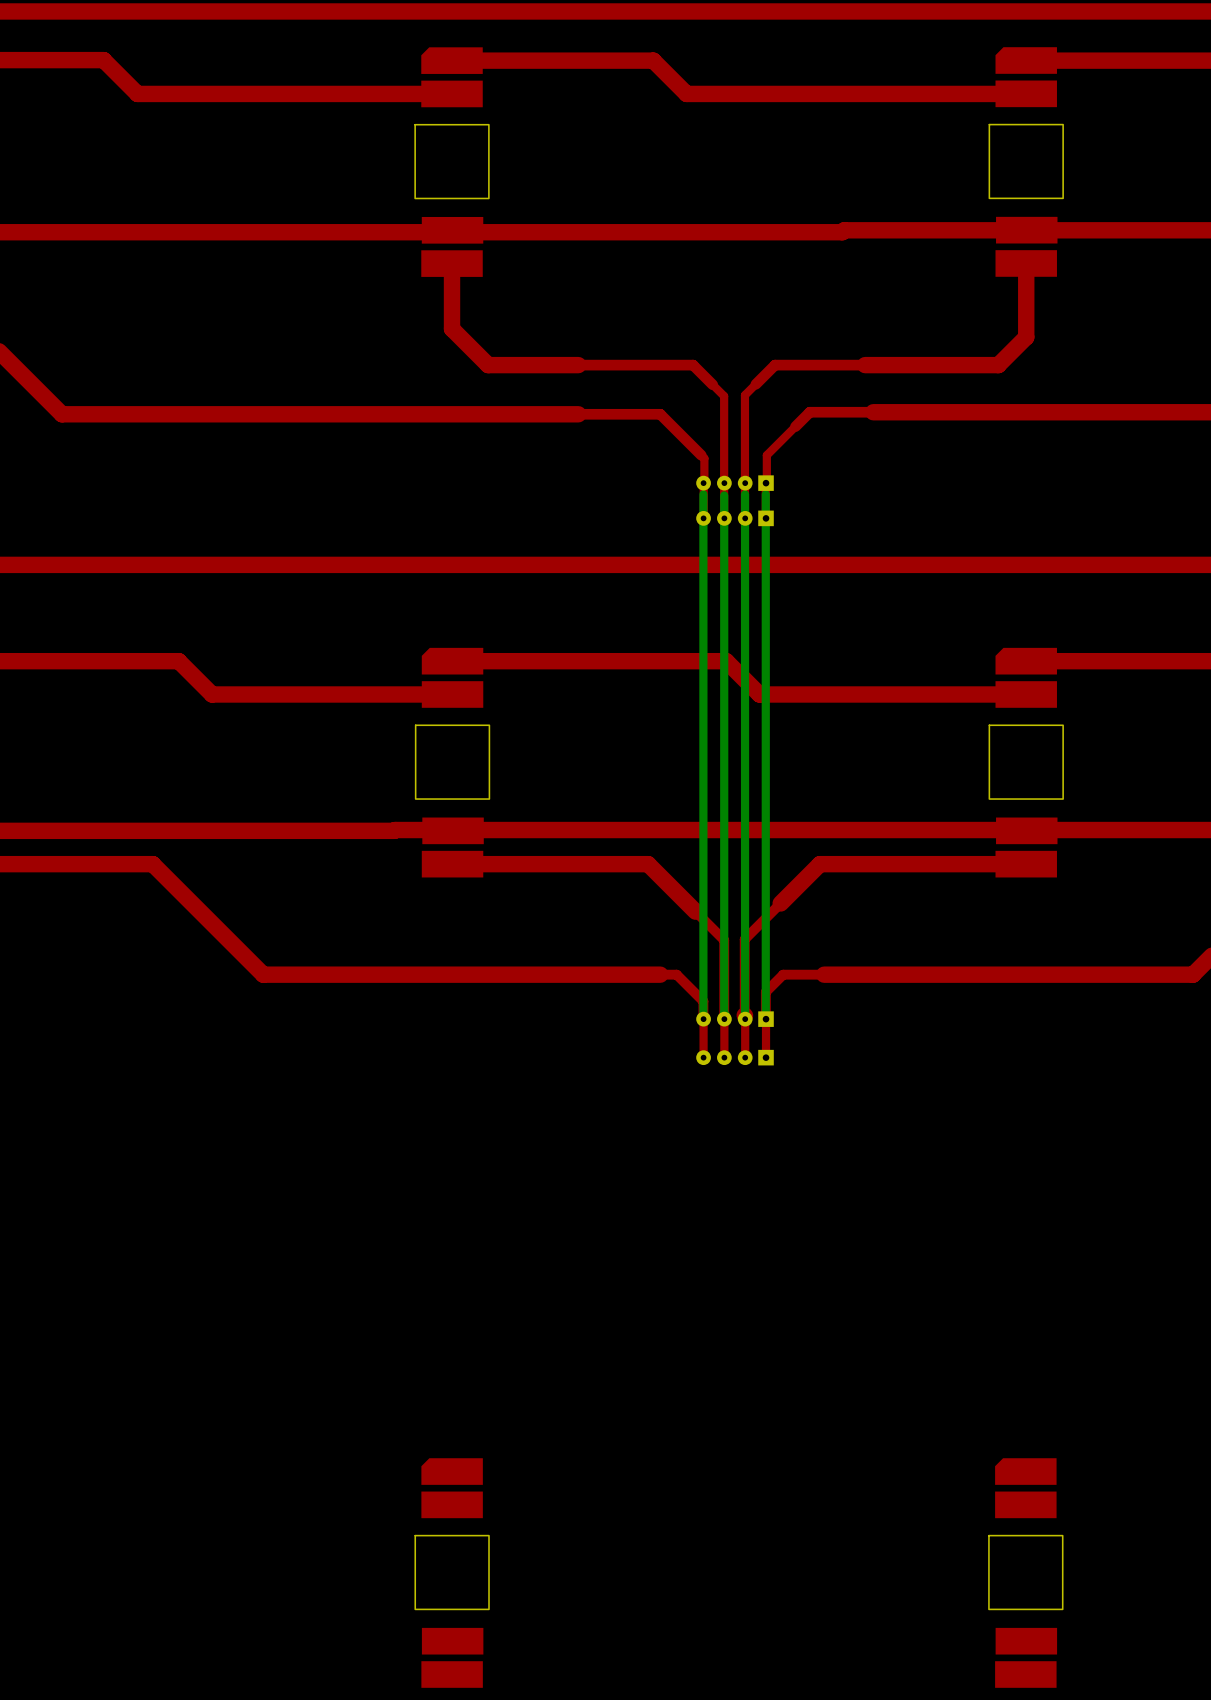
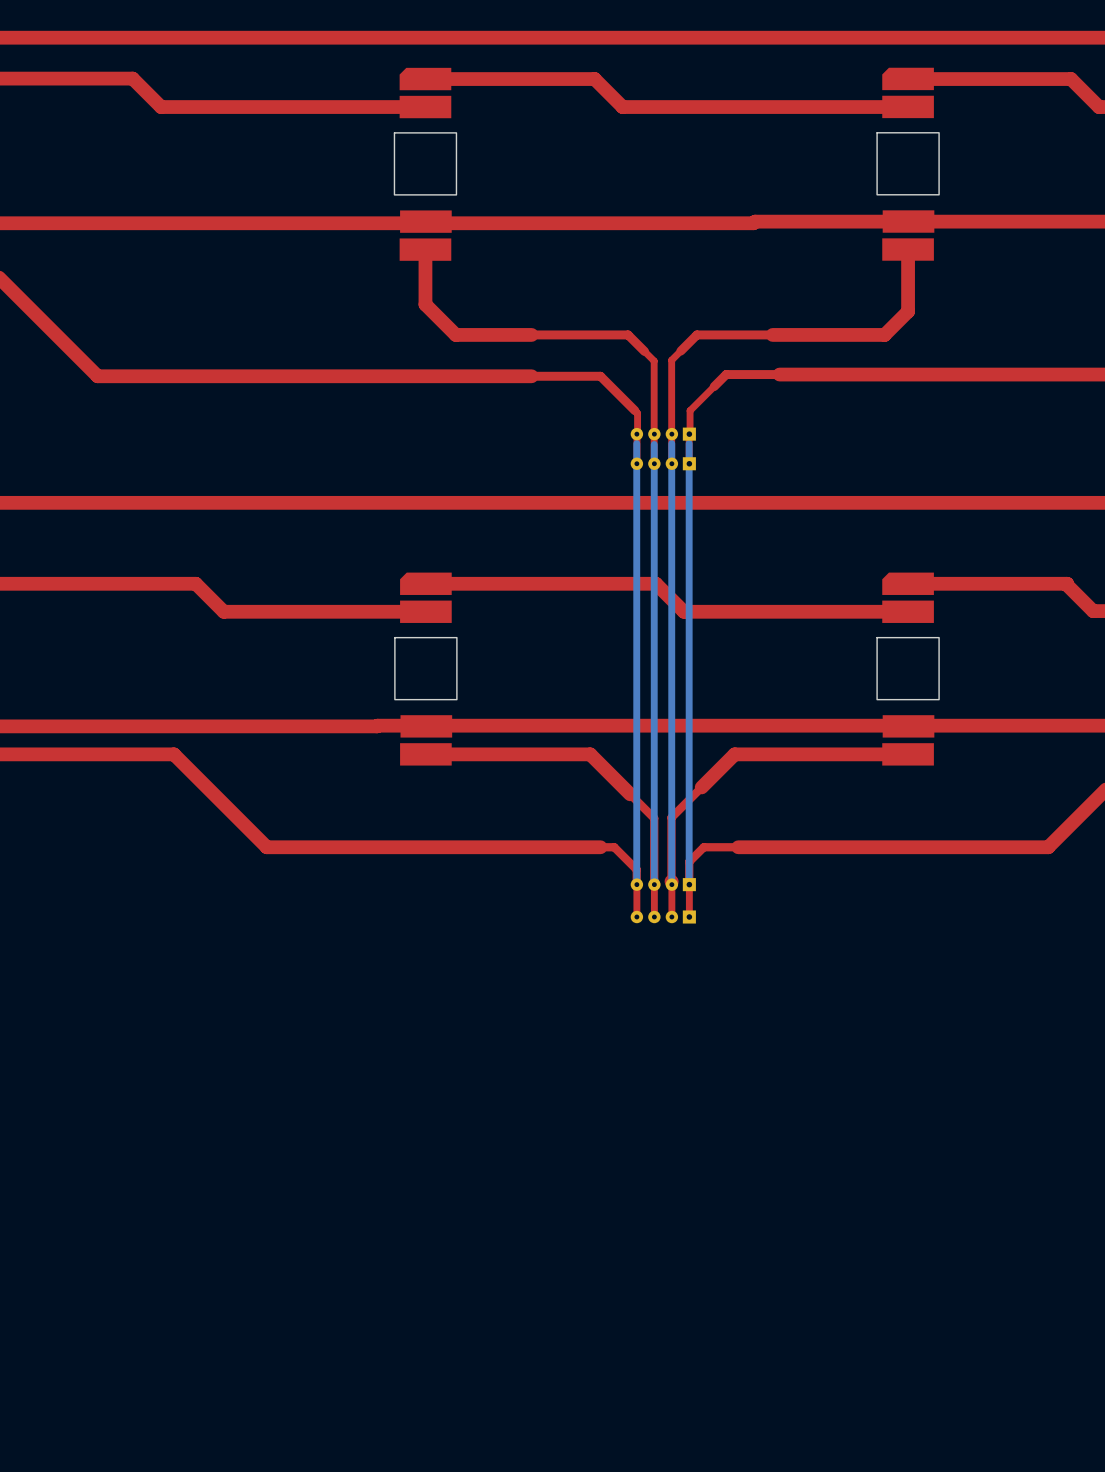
part: (452, 1573) -> none
part: (1025, 1573) -> none

